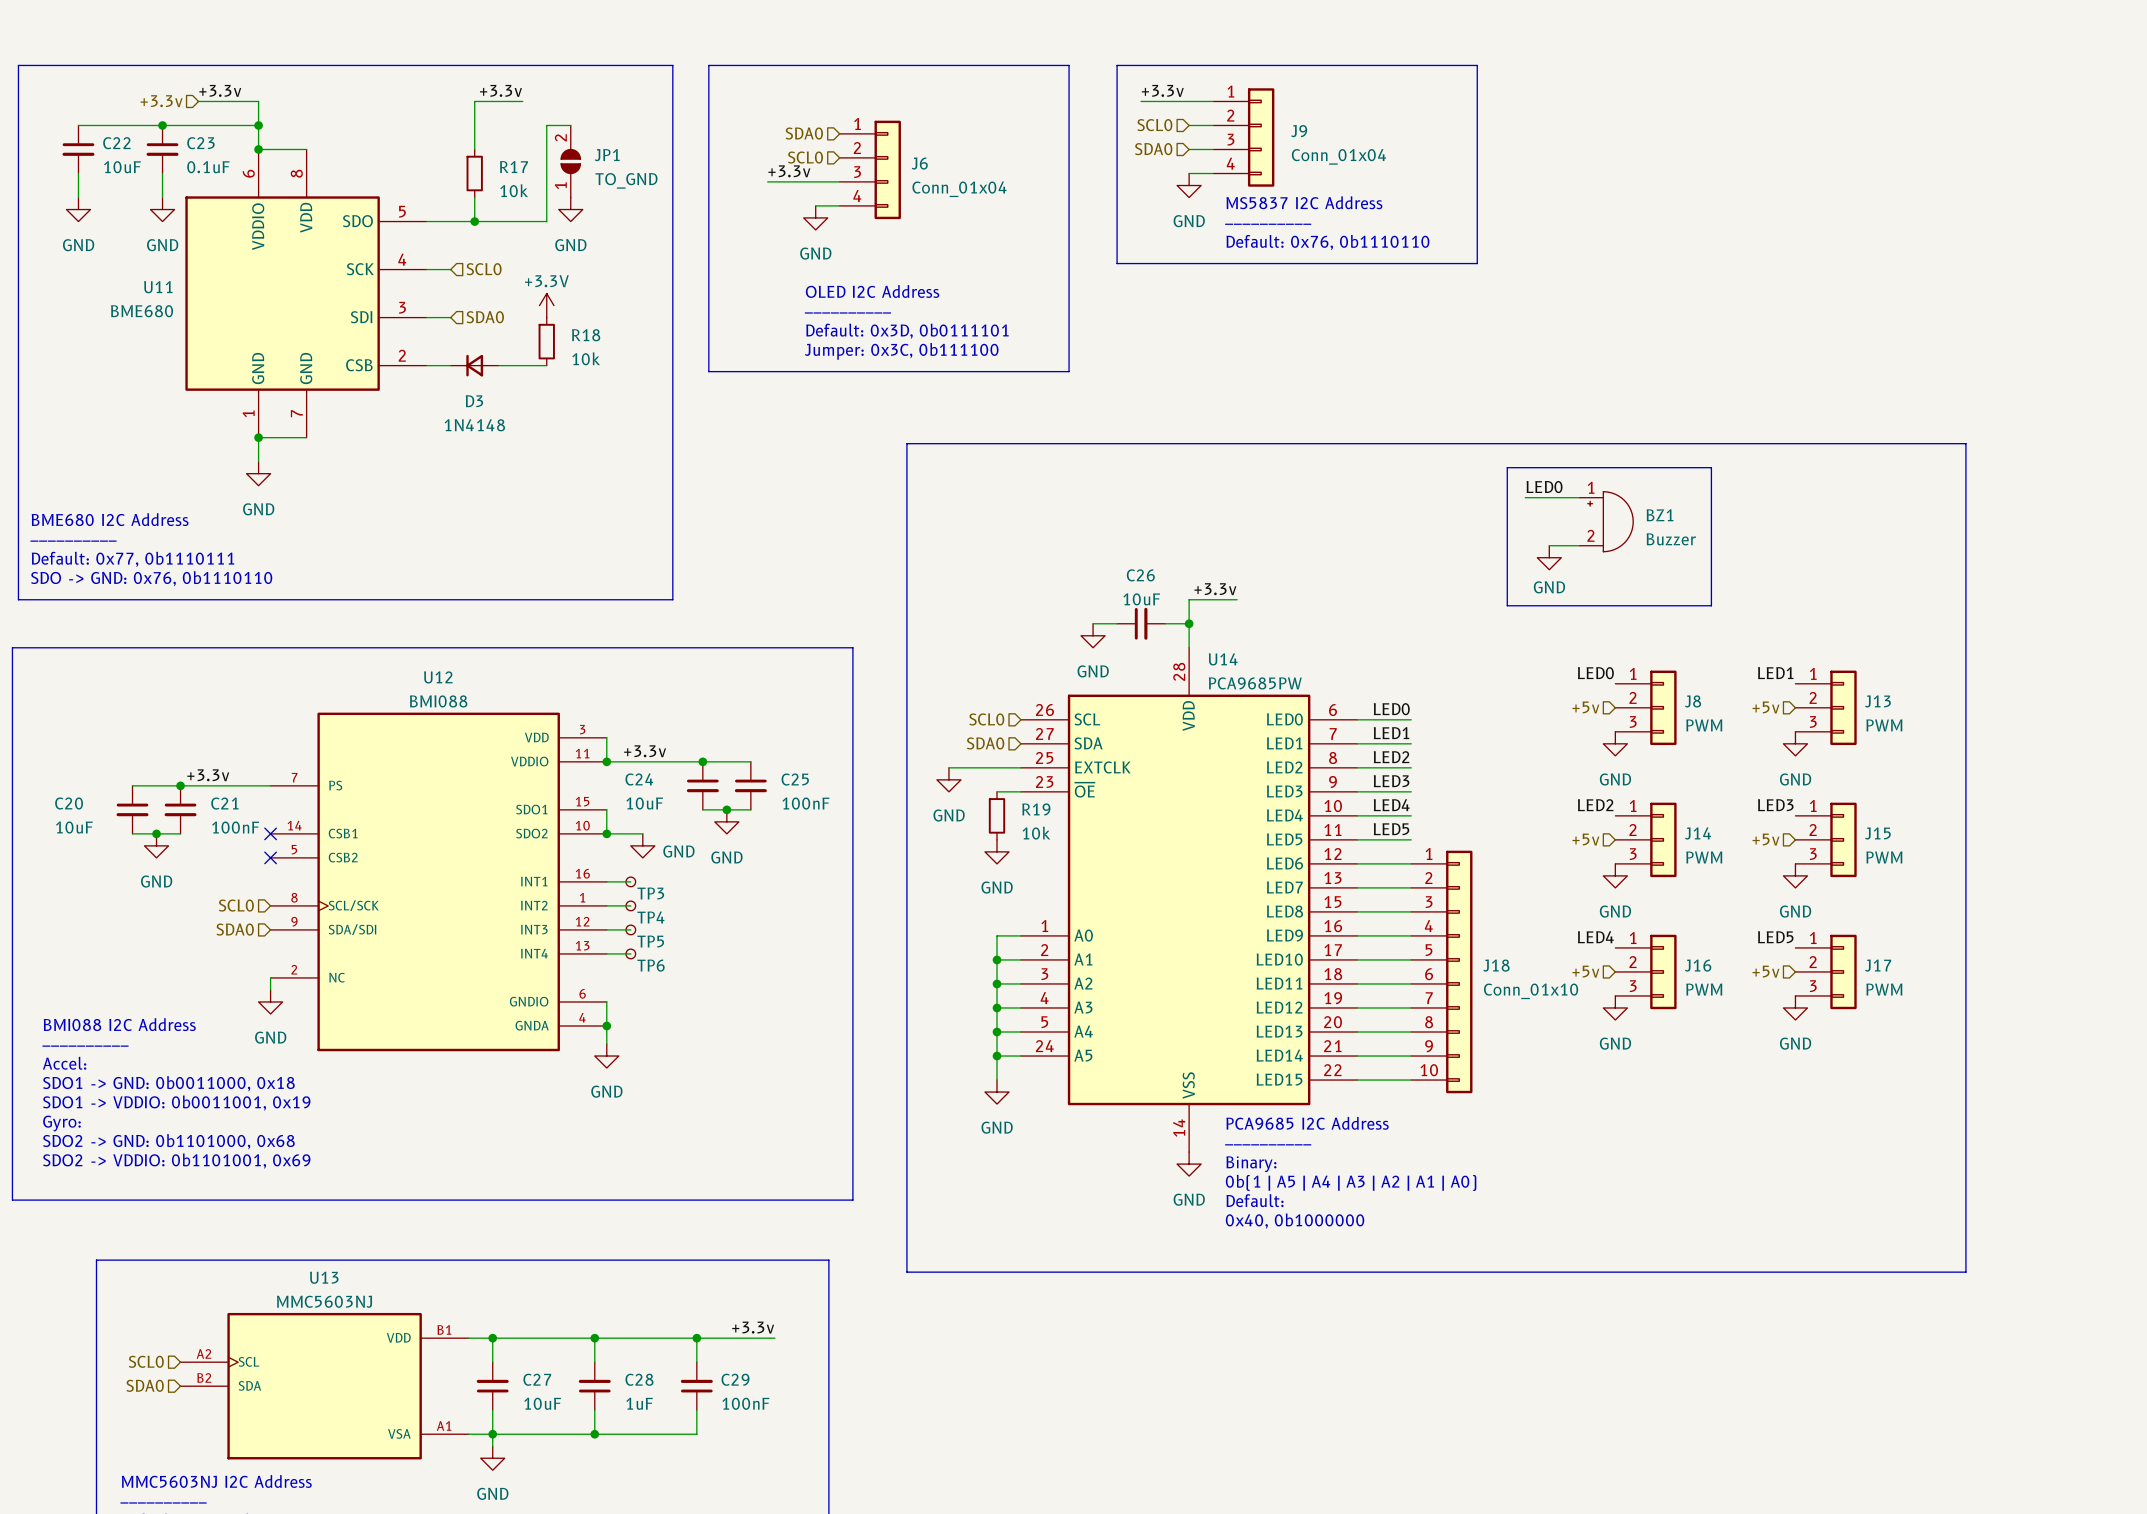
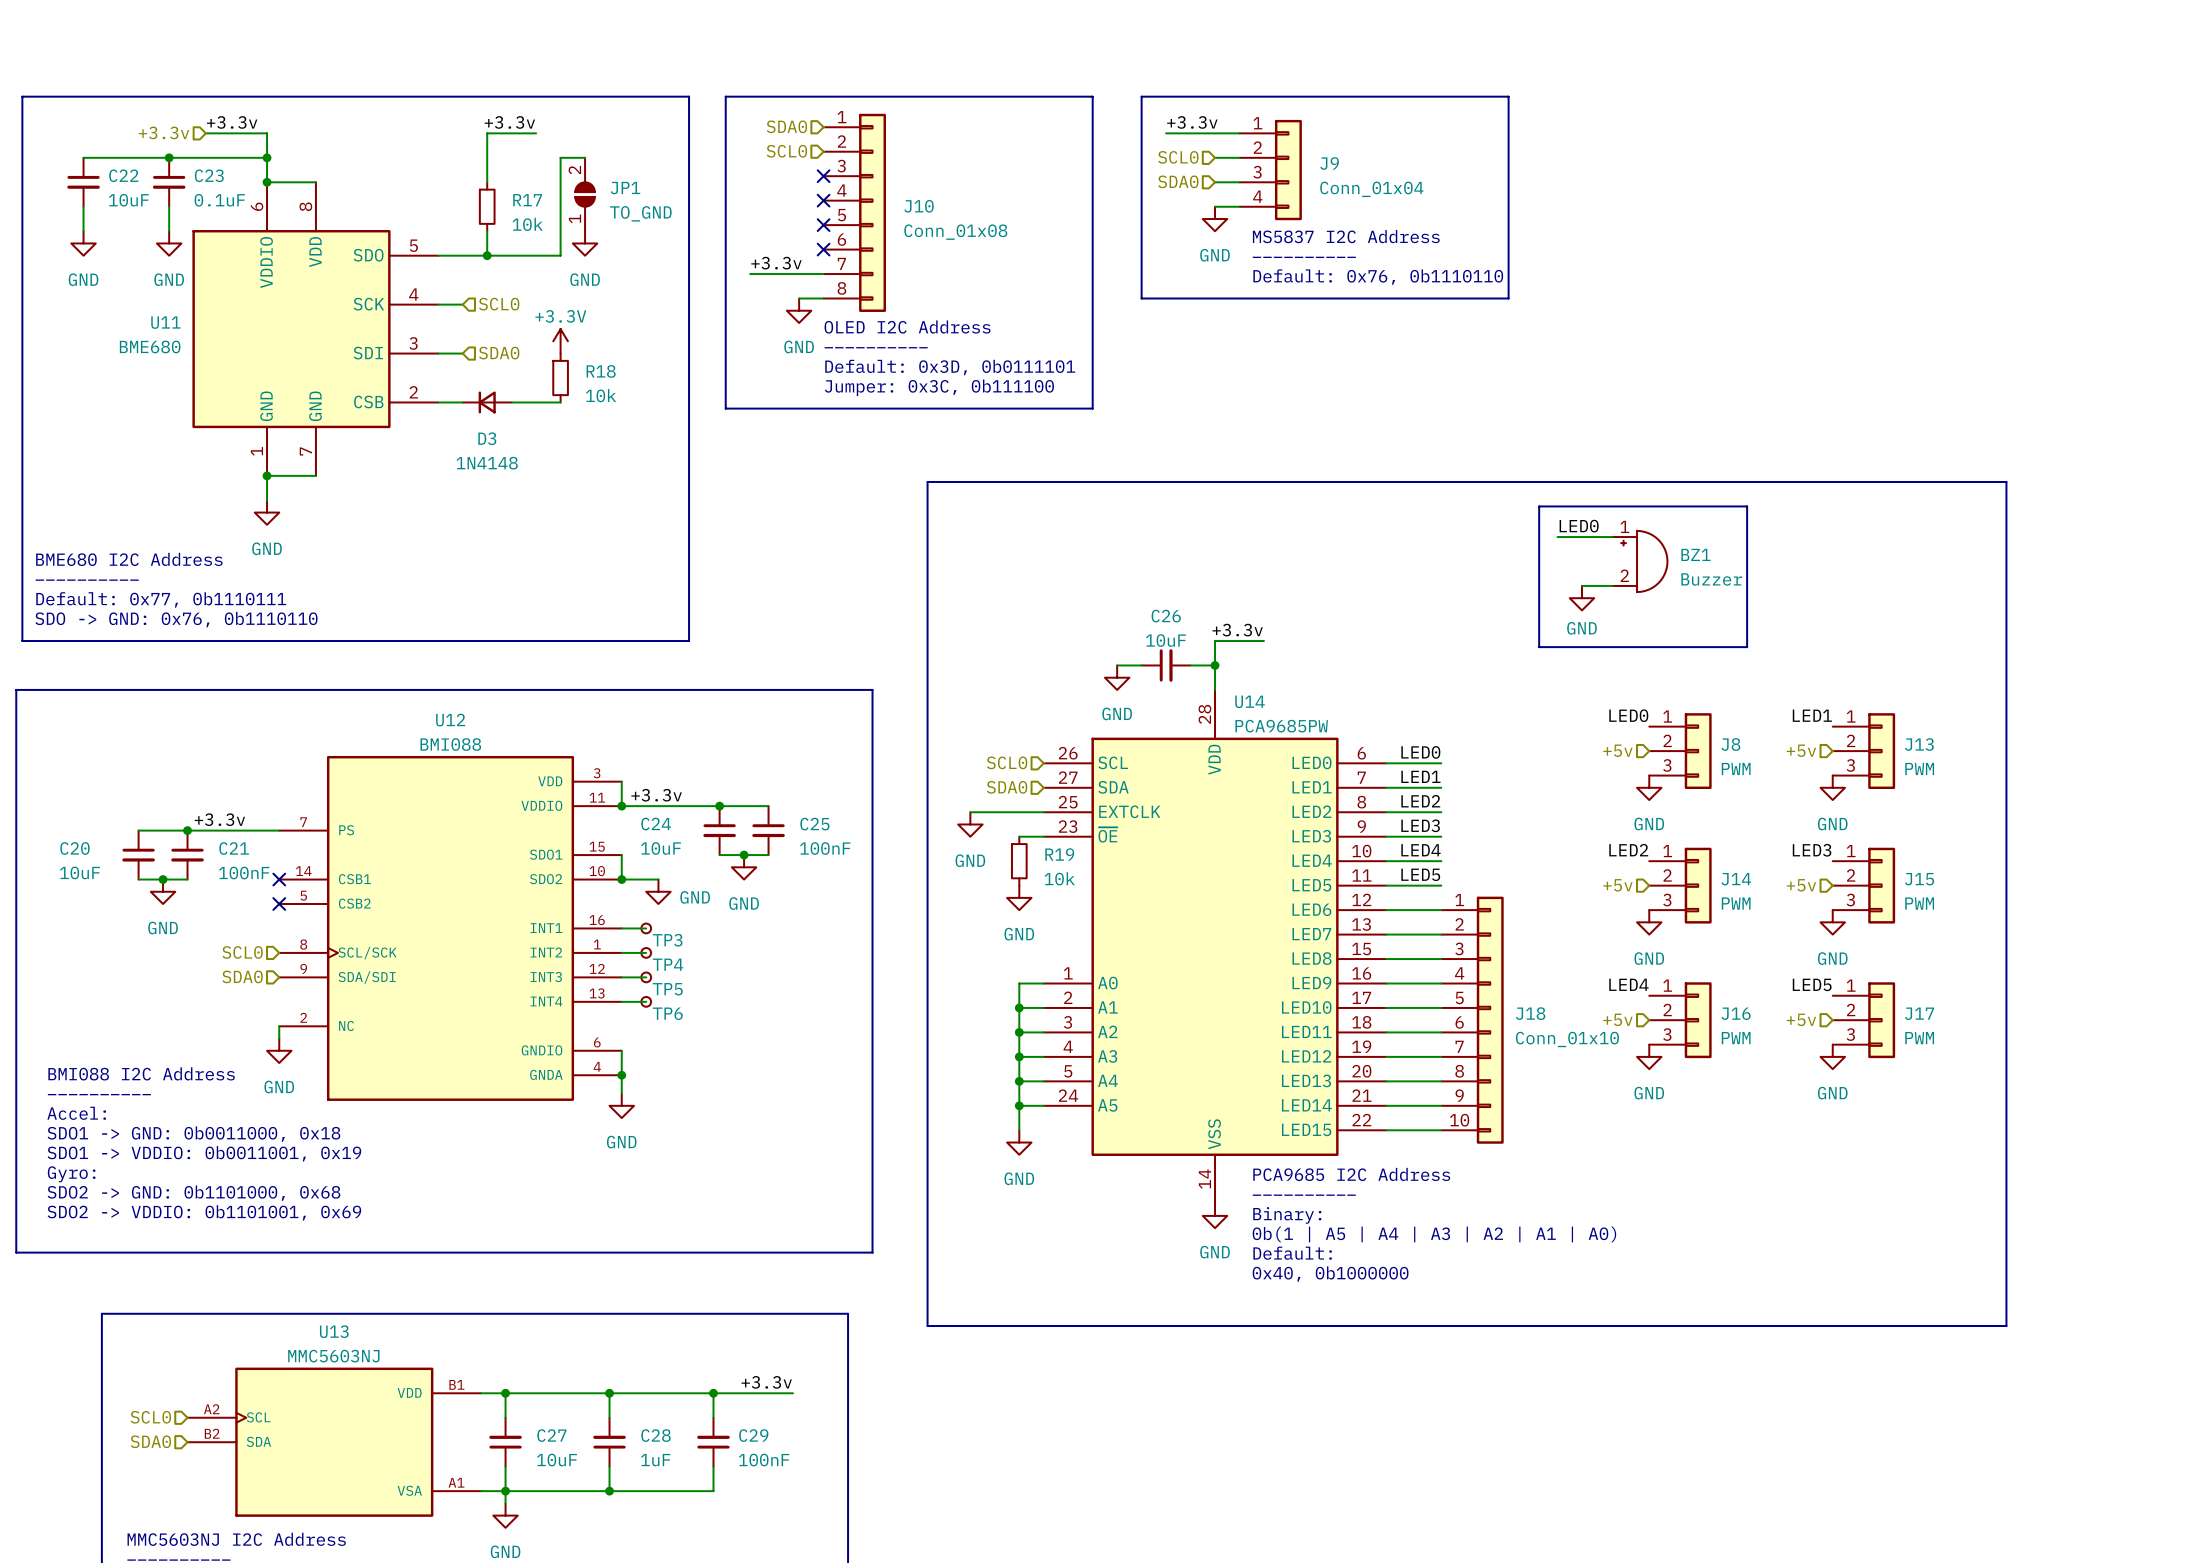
hierarchical label position: SDA0 (804, 133) -> SDA0 (786, 126)
no-connect mark: none -> (823, 176)
hierarchical label position: SCL0 (805, 157) -> SCL0 (786, 151)
no-connect mark: none -> (823, 200)
J6: Conn_01x04 (870, 169) -> none
label position: +3.3v (789, 171) -> +3.3v (776, 263)
J10: none -> Conn_01x08 (854, 212)
wire: (767, 181) (839, 181) -> (750, 274) (823, 274)
no-connect mark: none -> (823, 225)
wire: (815, 205) (839, 205) -> (799, 298) (823, 298)
no-connect mark: none -> (823, 249)
power symbol position: GND (815, 217) -> GND (799, 310)

